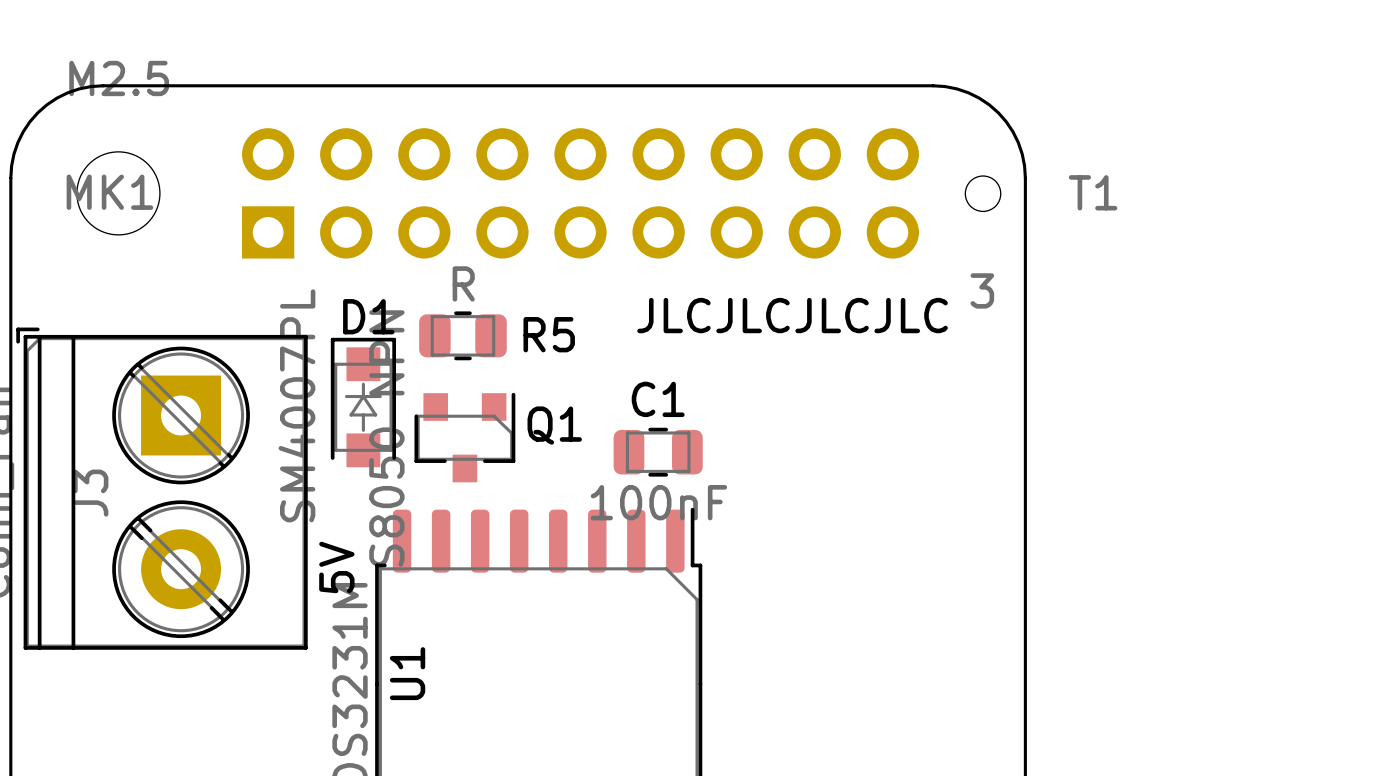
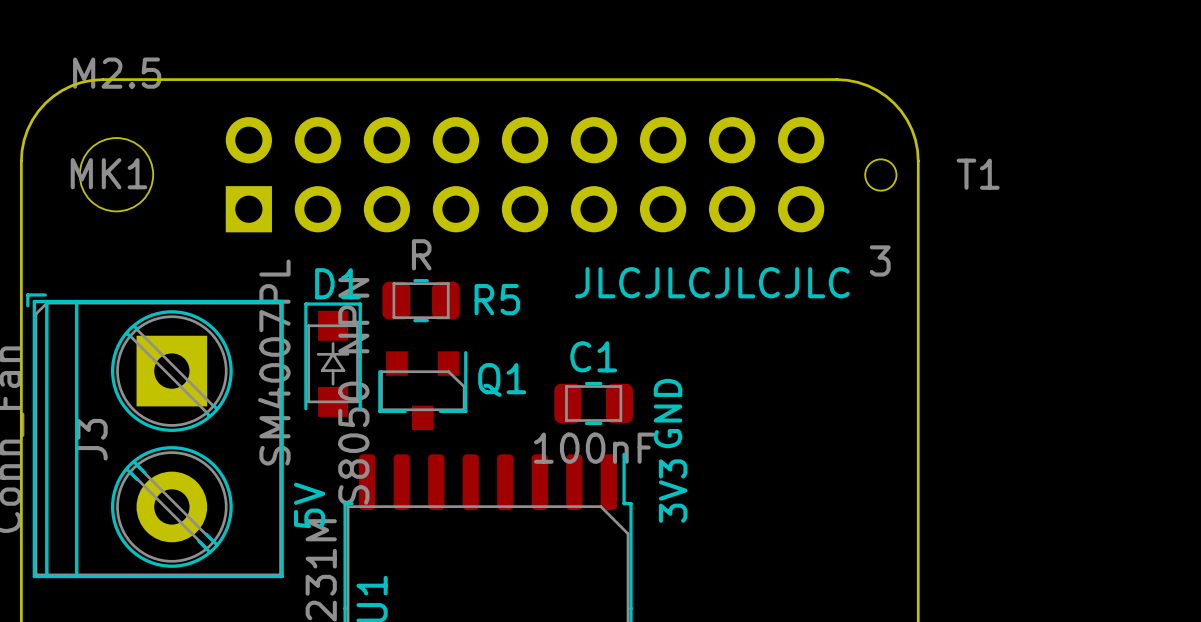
text: none -> GND (668, 413)
text: none -> 3V3 (673, 491)

